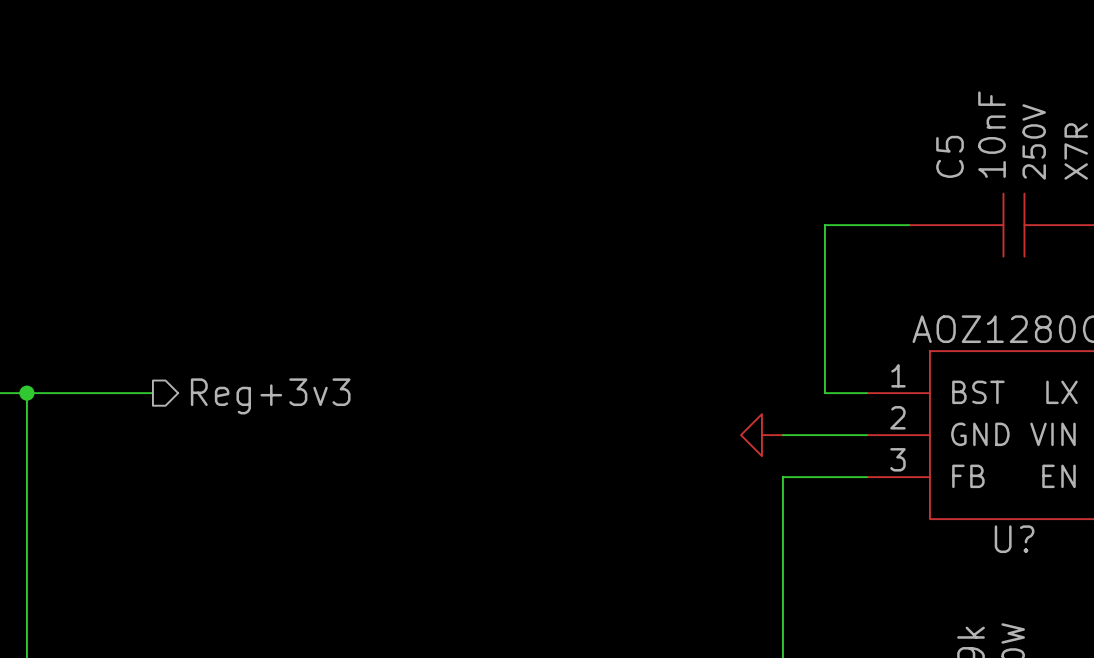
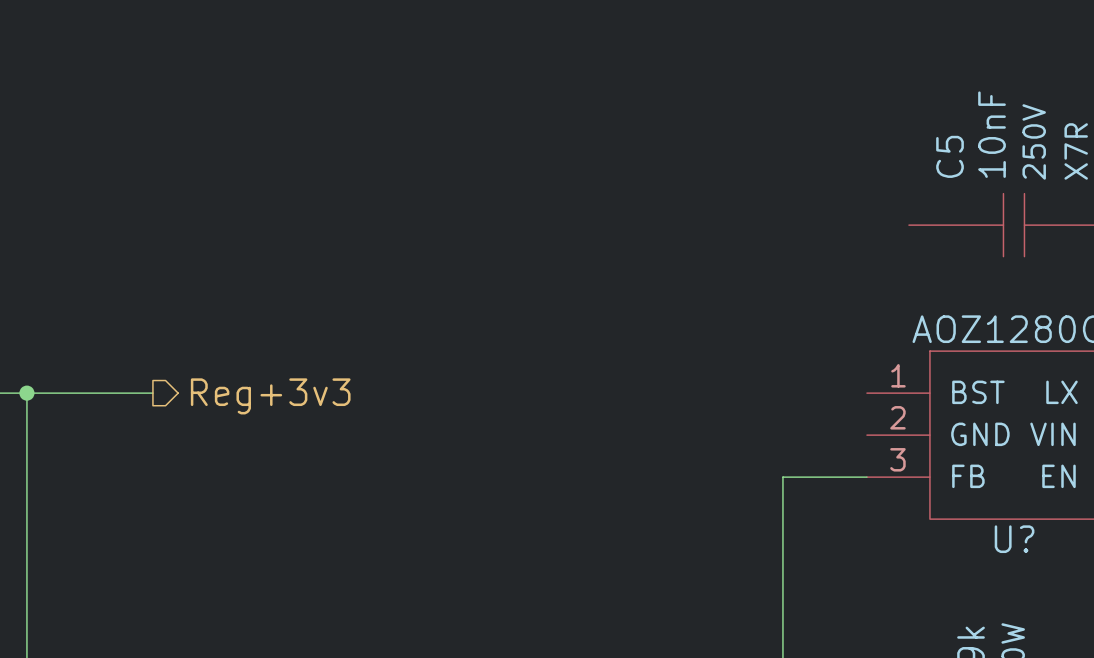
wire: (908, 225) (824, 225) (824, 393) (866, 393) -> none
power symbol: (761, 435) -> none
wire: (782, 435) (866, 435) -> none

